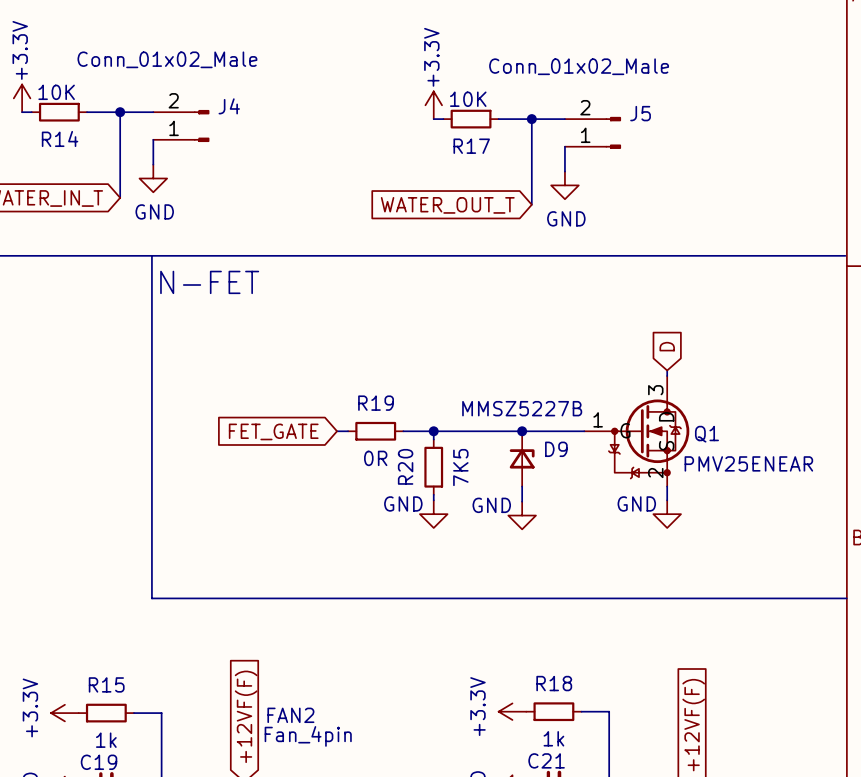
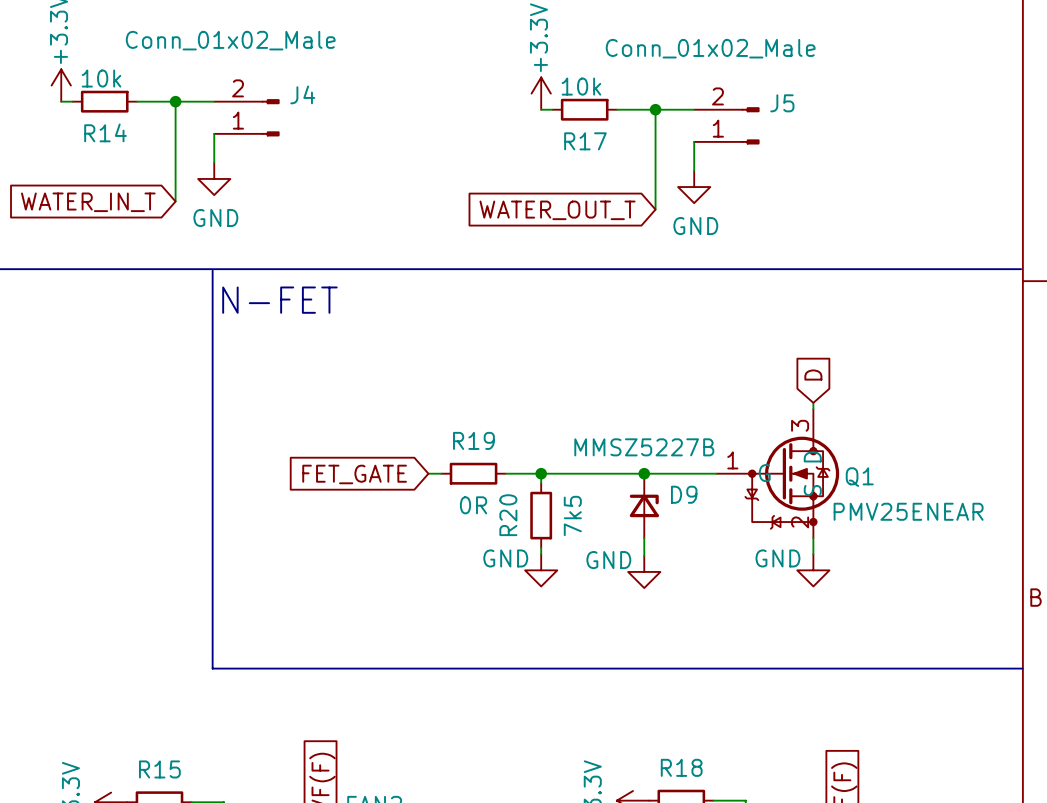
R14 value: 10K (56, 92) -> 10k (101, 78)
R17 value: 10K (468, 99) -> 10k (581, 86)
R20 value: 7K5 (460, 467) -> 7k5 (572, 515)

